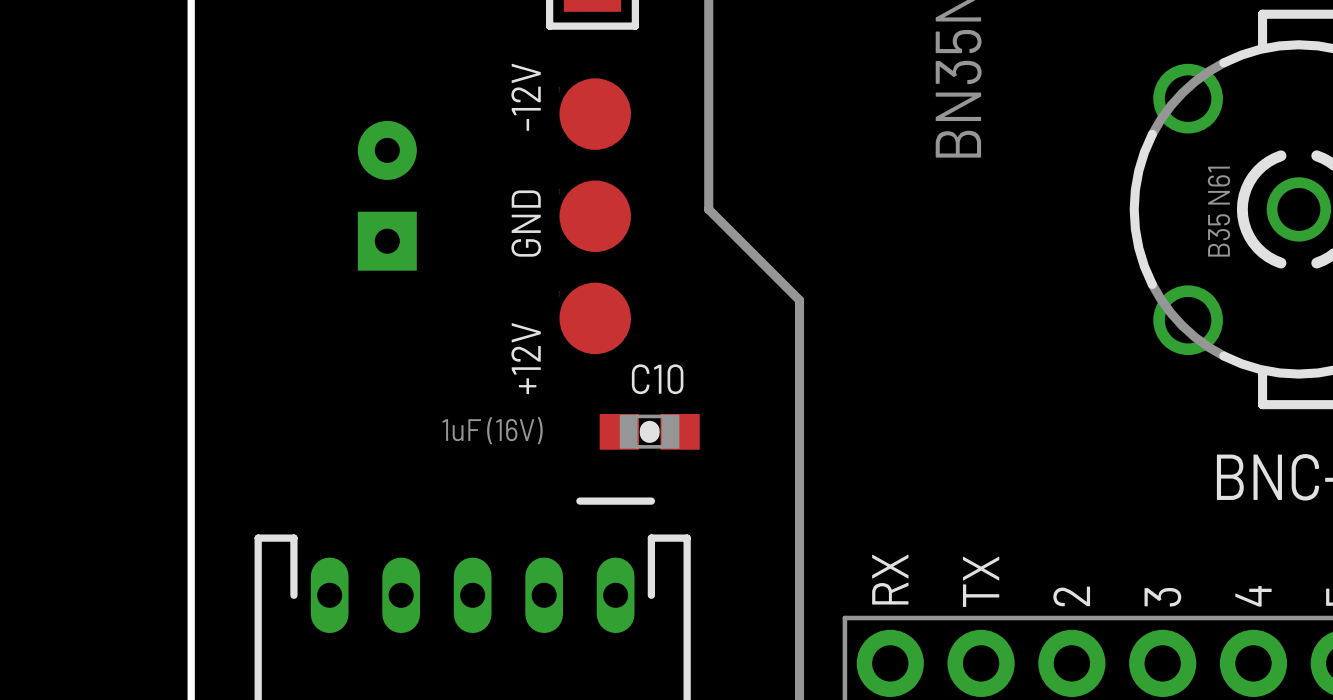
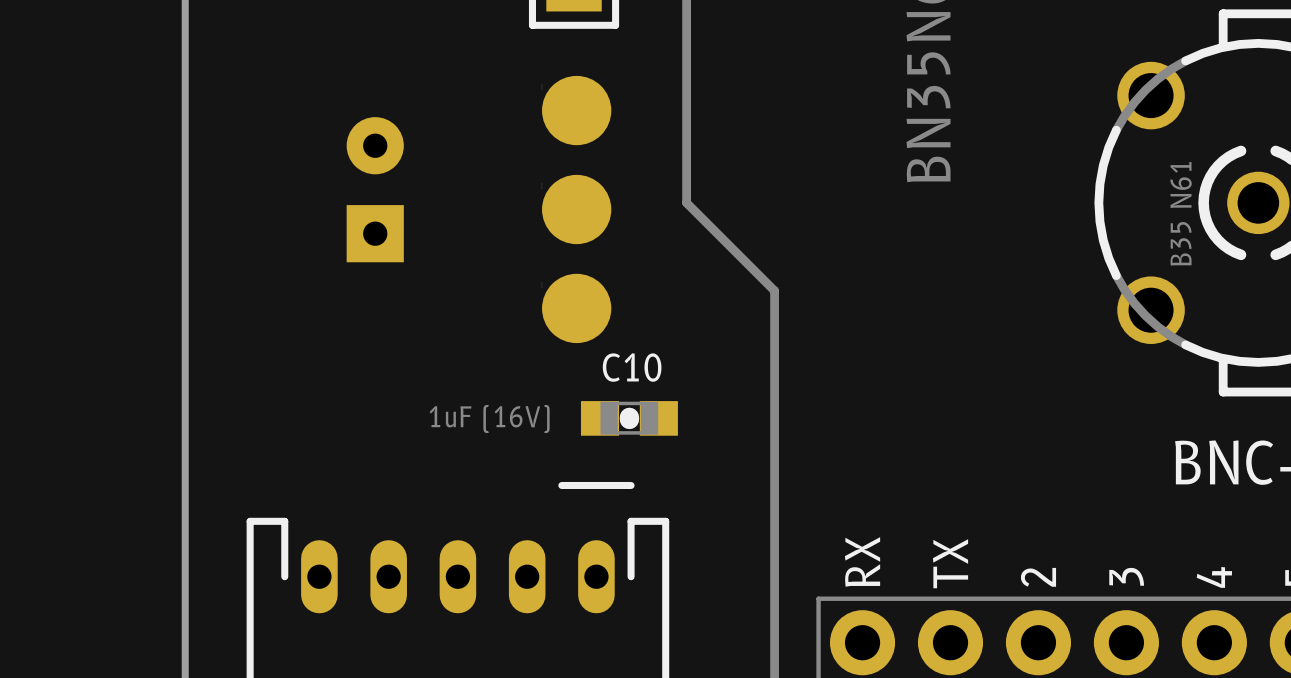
text: -12V (526, 97) -> none
text: GND (526, 223) -> none
text: +12V (526, 358) -> none

